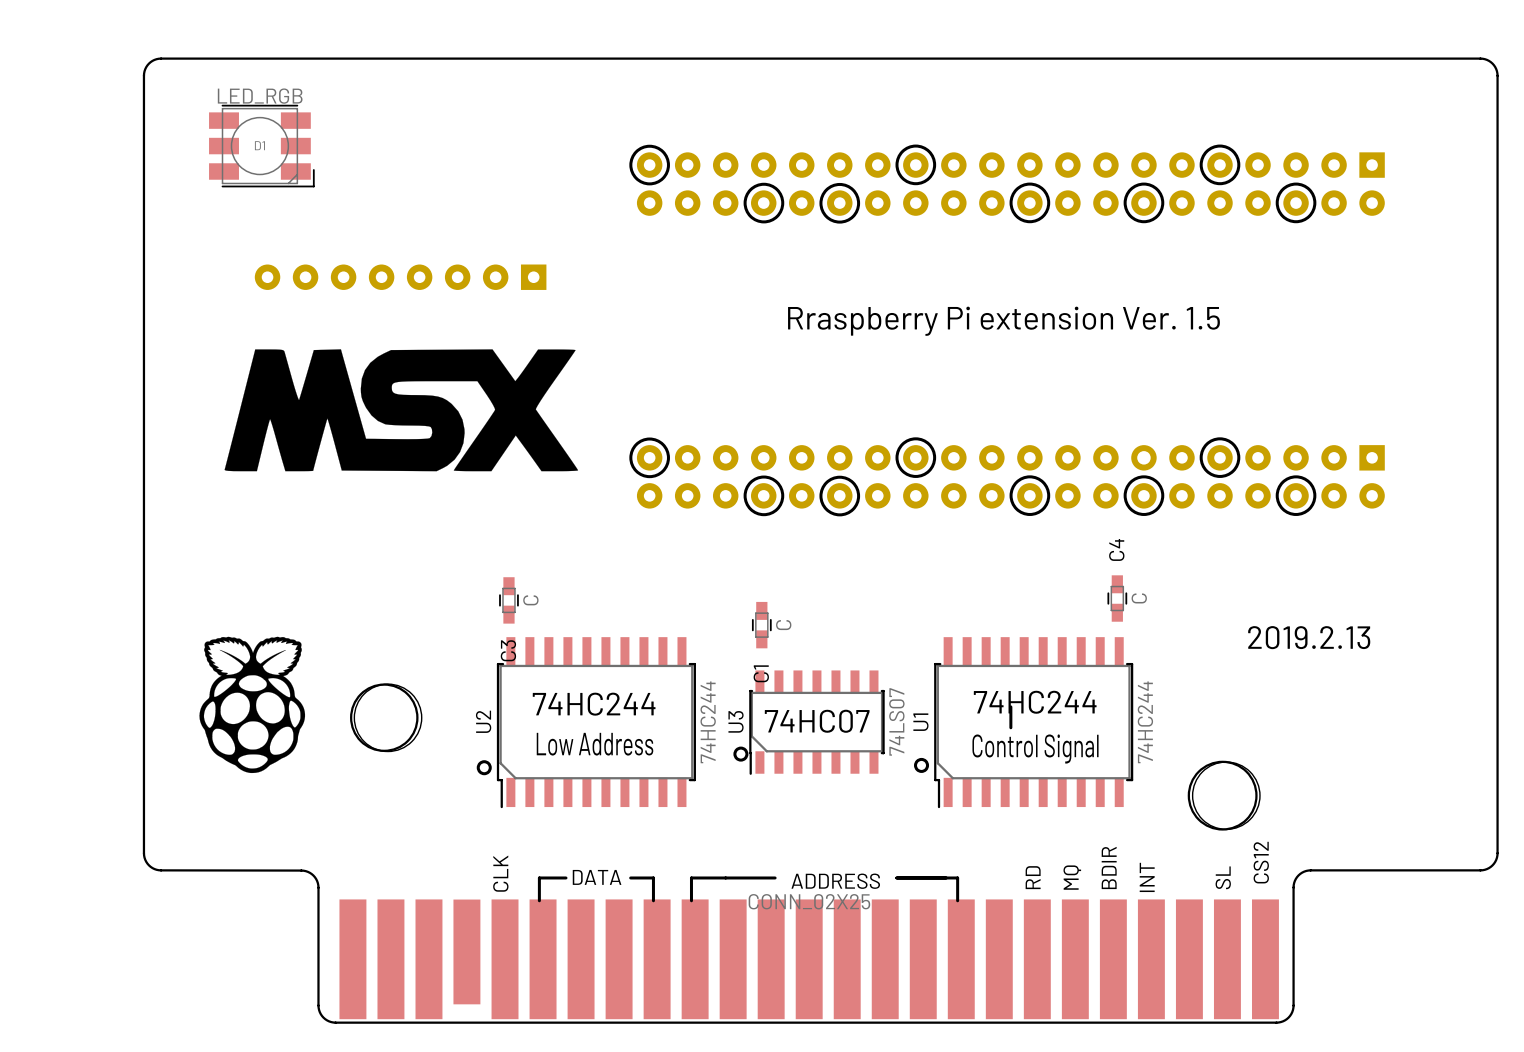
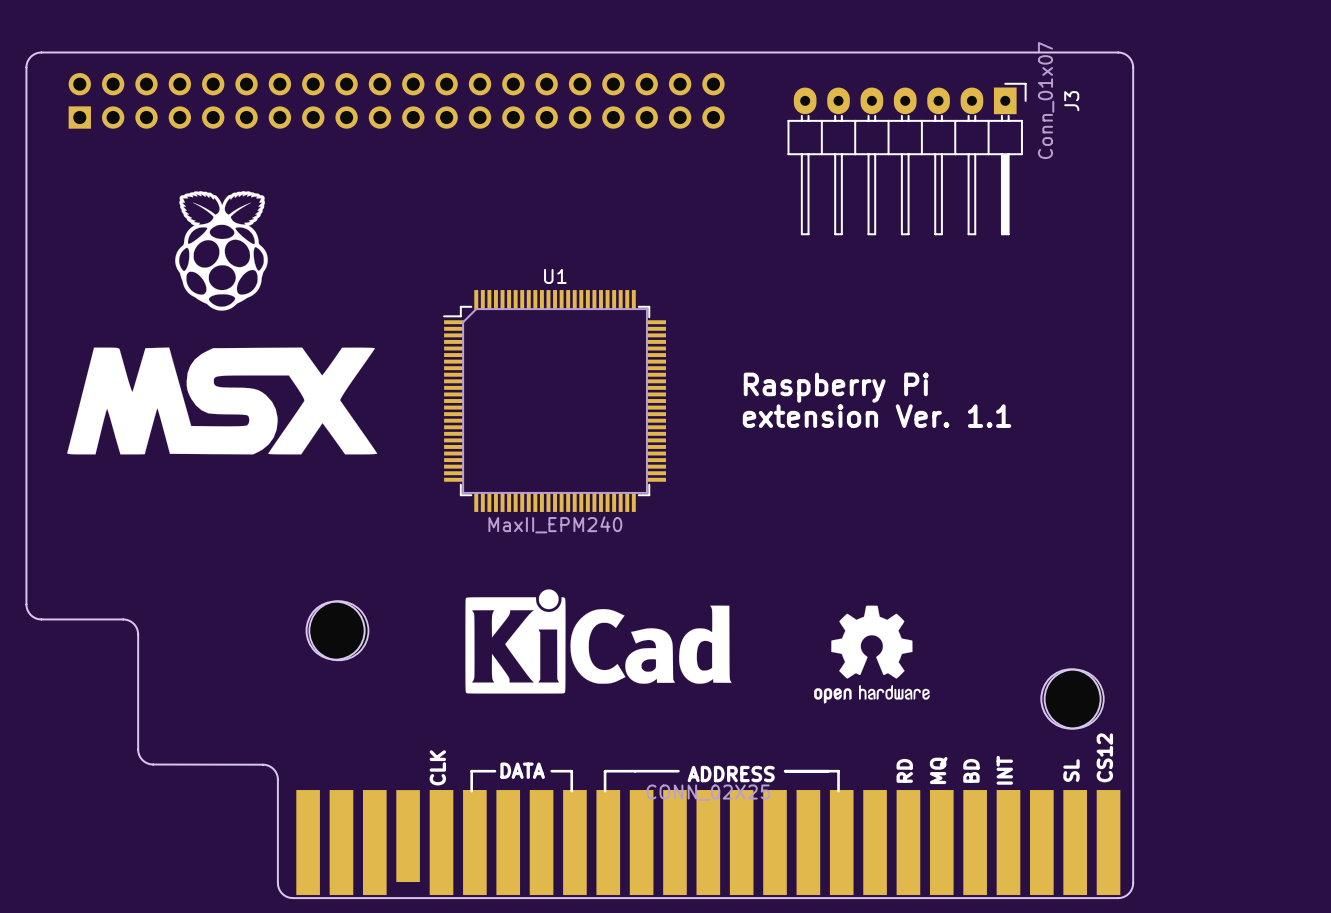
board edge: (161, 58) (148, 63) (143, 75) (144, 855) (148, 865) (158, 870) (301, 870) -> (139, 52) (39, 52) (30, 56) (26, 63) (26, 606) (30, 615) (39, 619) (123, 619) (128, 620) (135, 625) (138, 634) (138, 751) (144, 761) (153, 764) (262, 764)
board edge: (1276, 58) (1482, 58) (1492, 63) (1497, 75) (1496, 857) (1492, 865) (1482, 870) (1308, 870) (1298, 875) (1293, 887) -> (1118, 52) (1128, 56) (1133, 67) (1133, 779)
part: none -> (396, 100)
drawing: [629, 144, 670, 186] -> none
drawing: [895, 144, 937, 186] -> none
drawing: [1199, 144, 1241, 186] -> none
D1: LED_RGB (261, 146) -> none
J3: none -> Conn_01x07 (907, 159)
drawing: [743, 182, 785, 224] -> none
drawing: [819, 182, 861, 224] -> none
drawing: [1009, 182, 1051, 224] -> none
drawing: [1123, 182, 1165, 224] -> none
drawing: [1275, 182, 1317, 224] -> none
part: (1010, 184) -> none
drawing: none -> [175, 191, 268, 311]
part: (400, 277) -> none
text: Rraspberry Pi extension Ver. 1.5 (1003, 321) -> none
drawing position: (401, 410) -> (222, 400)
drawing: [629, 437, 670, 479] -> none
drawing: [895, 437, 937, 478] -> none
drawing: [1199, 437, 1241, 478] -> none
text: none -> Raspberry Pi (836, 387)
text: none -> extension Ver. 1.1 (877, 416)
drawing: [743, 475, 785, 517] -> none
drawing: [819, 475, 861, 517] -> none
drawing: [1009, 475, 1051, 516] -> none
drawing: [1123, 475, 1165, 516] -> none
drawing: [1275, 475, 1317, 516] -> none
part: (1010, 476) -> none
C4: C (1117, 598) -> none
C3: C (508, 600) -> none
C1: C (761, 625) -> none
drawing: [199, 636, 306, 774] -> none
U1 footprint: [934, 637, 1134, 809] -> [443, 290, 666, 512]
text: 2019.2.13 (1309, 637) -> none
drawing: none -> [465, 589, 732, 694]
drawing: none -> [814, 605, 930, 704]
text: 74HC244 (1035, 702) -> none
text: 74HC244 (594, 704) -> none
line: (1010, 706) (1010, 727) -> none
text: 74HC07 (817, 721) -> none
U2: 74HC244 (596, 722) -> none
U3: 74LS07 (816, 722) -> none
U1 name position: U1 (920, 722) -> U1 (555, 276)
U1 value: 74HC244 (1145, 722) -> MaxII_EPM240 (555, 524)
text: Low Address (595, 744) -> none
drawing: [733, 746, 749, 762] -> none
text: Control Signal (1035, 748) -> none
drawing: [914, 757, 930, 773] -> none
drawing: [476, 760, 492, 776] -> none
text: BDIR (1109, 867) -> BD (971, 770)

